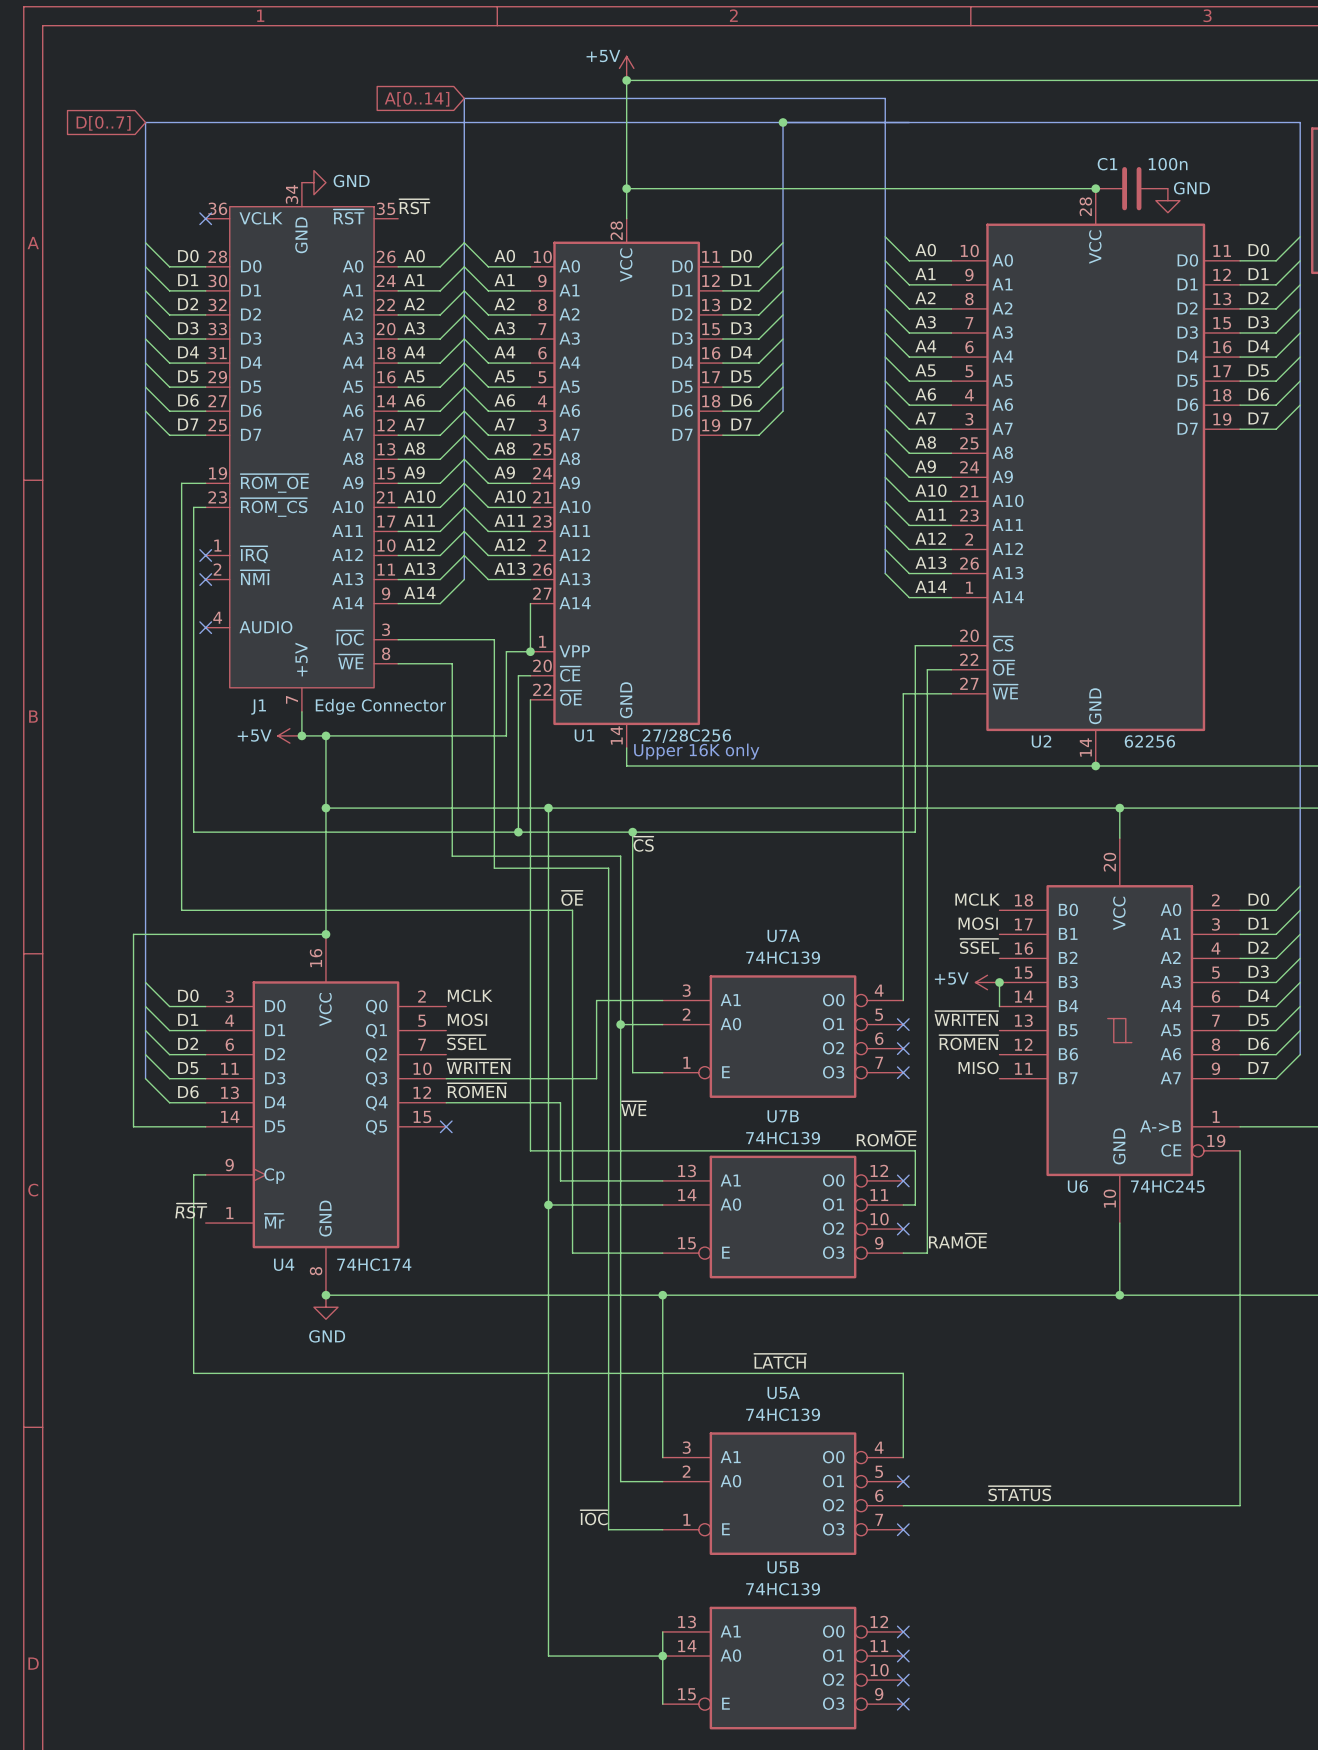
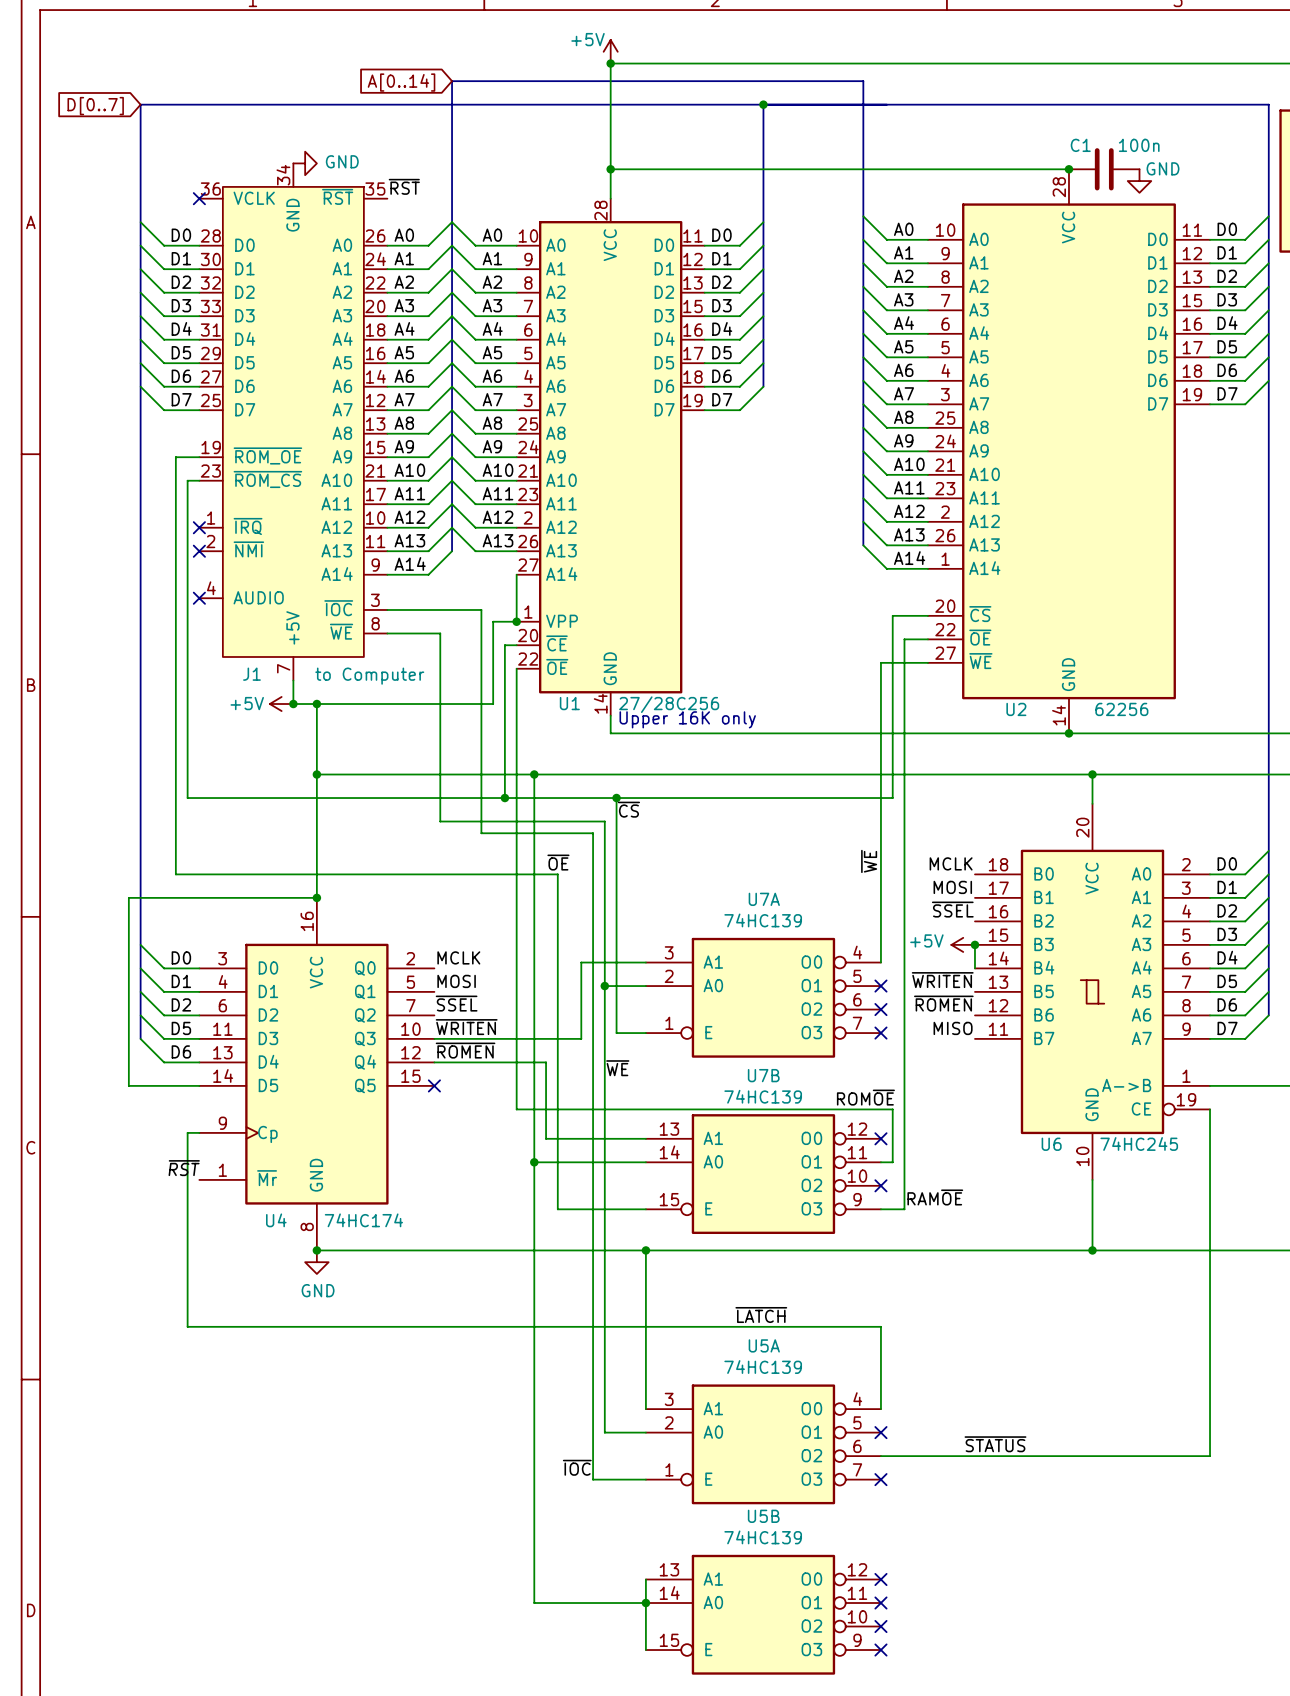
J1 value: Edge Connector (380, 706) -> to Computer (369, 676)
label: none -> ~{WE} (869, 861)

